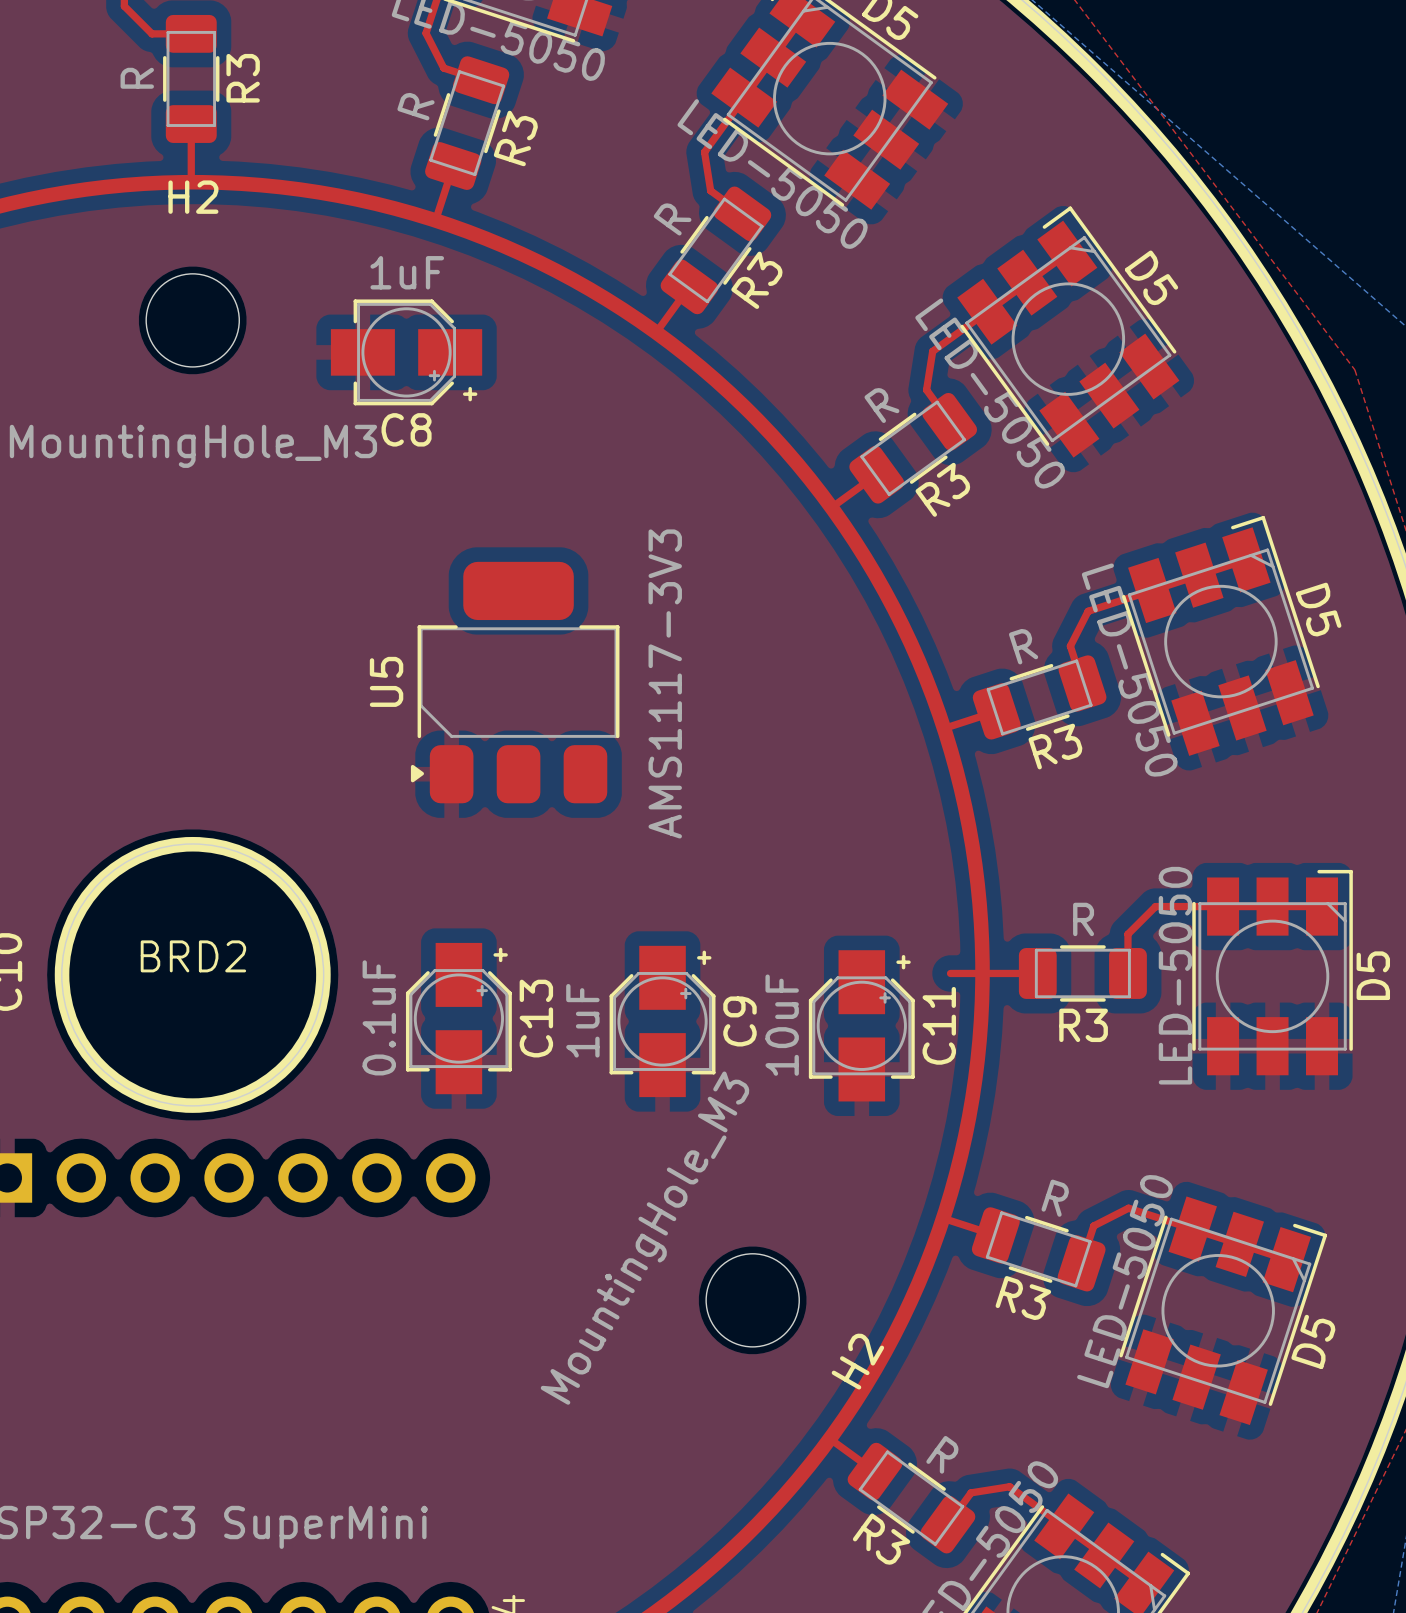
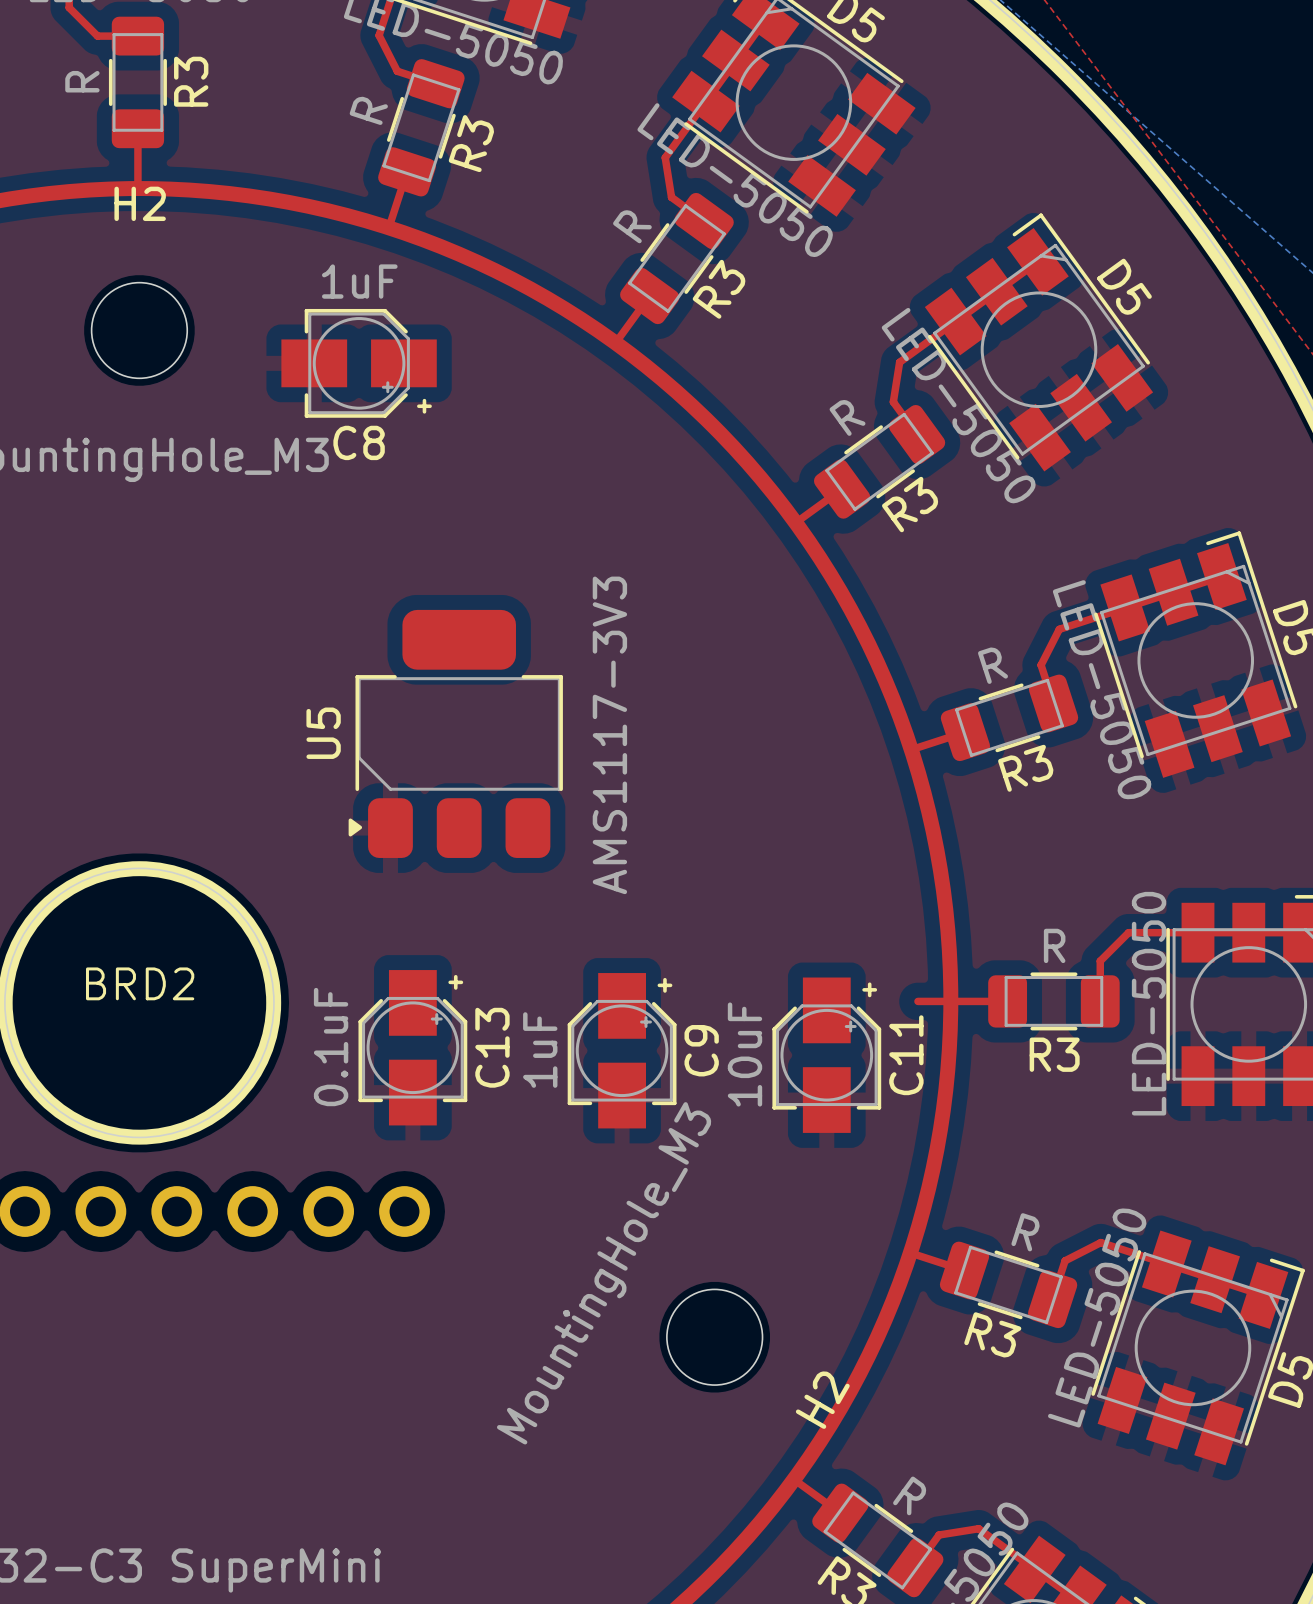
U5 position: (515, 682) -> (455, 733)

